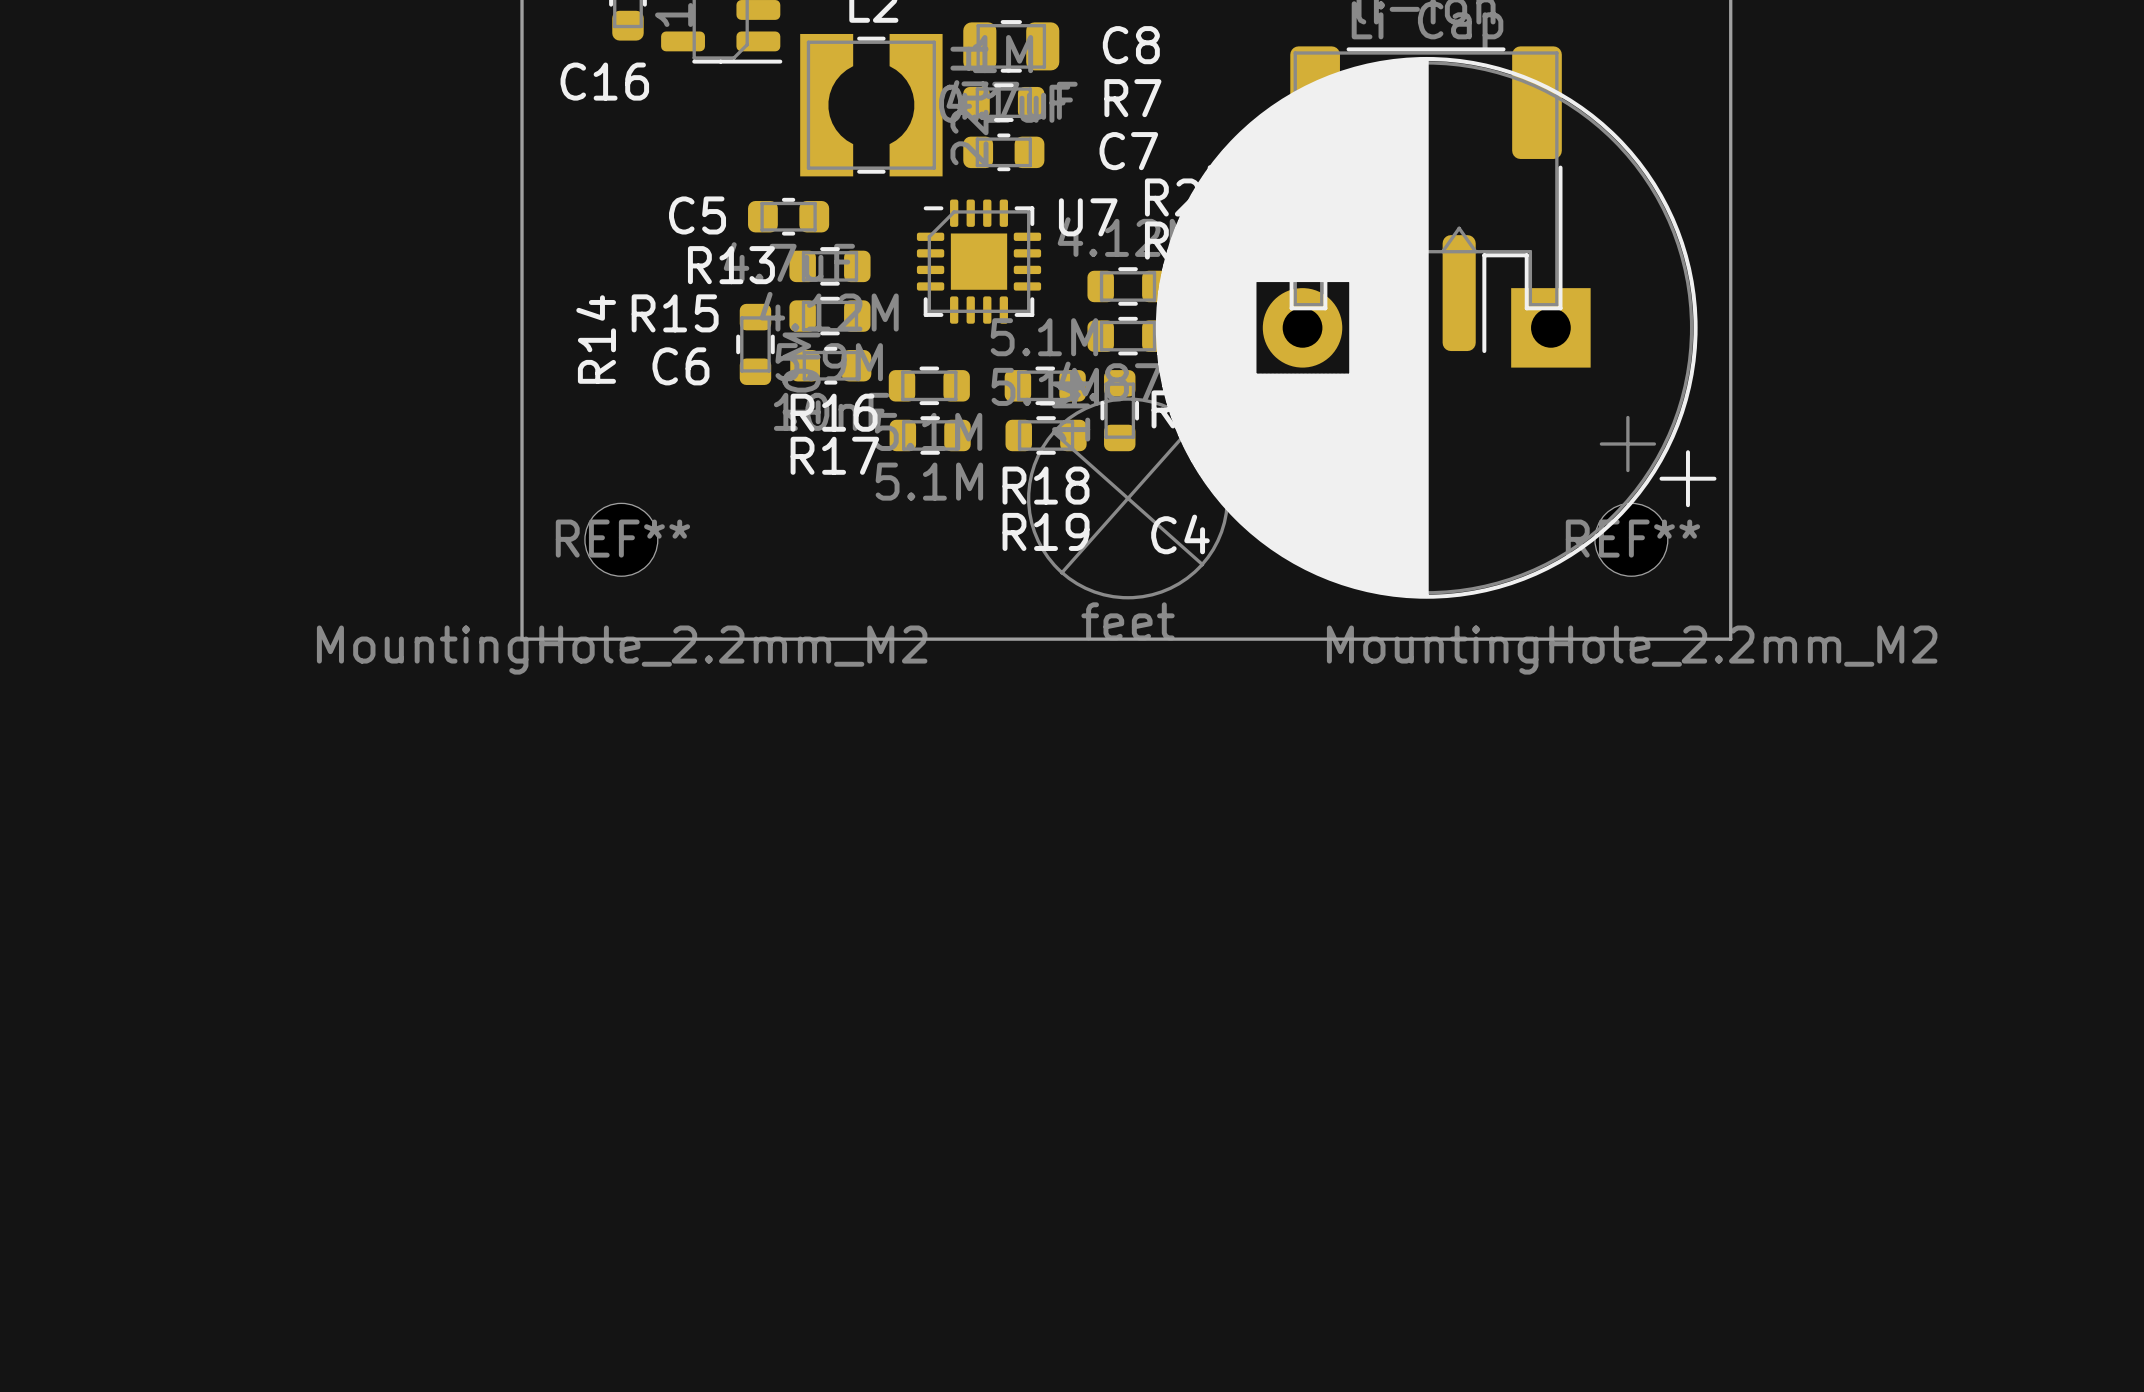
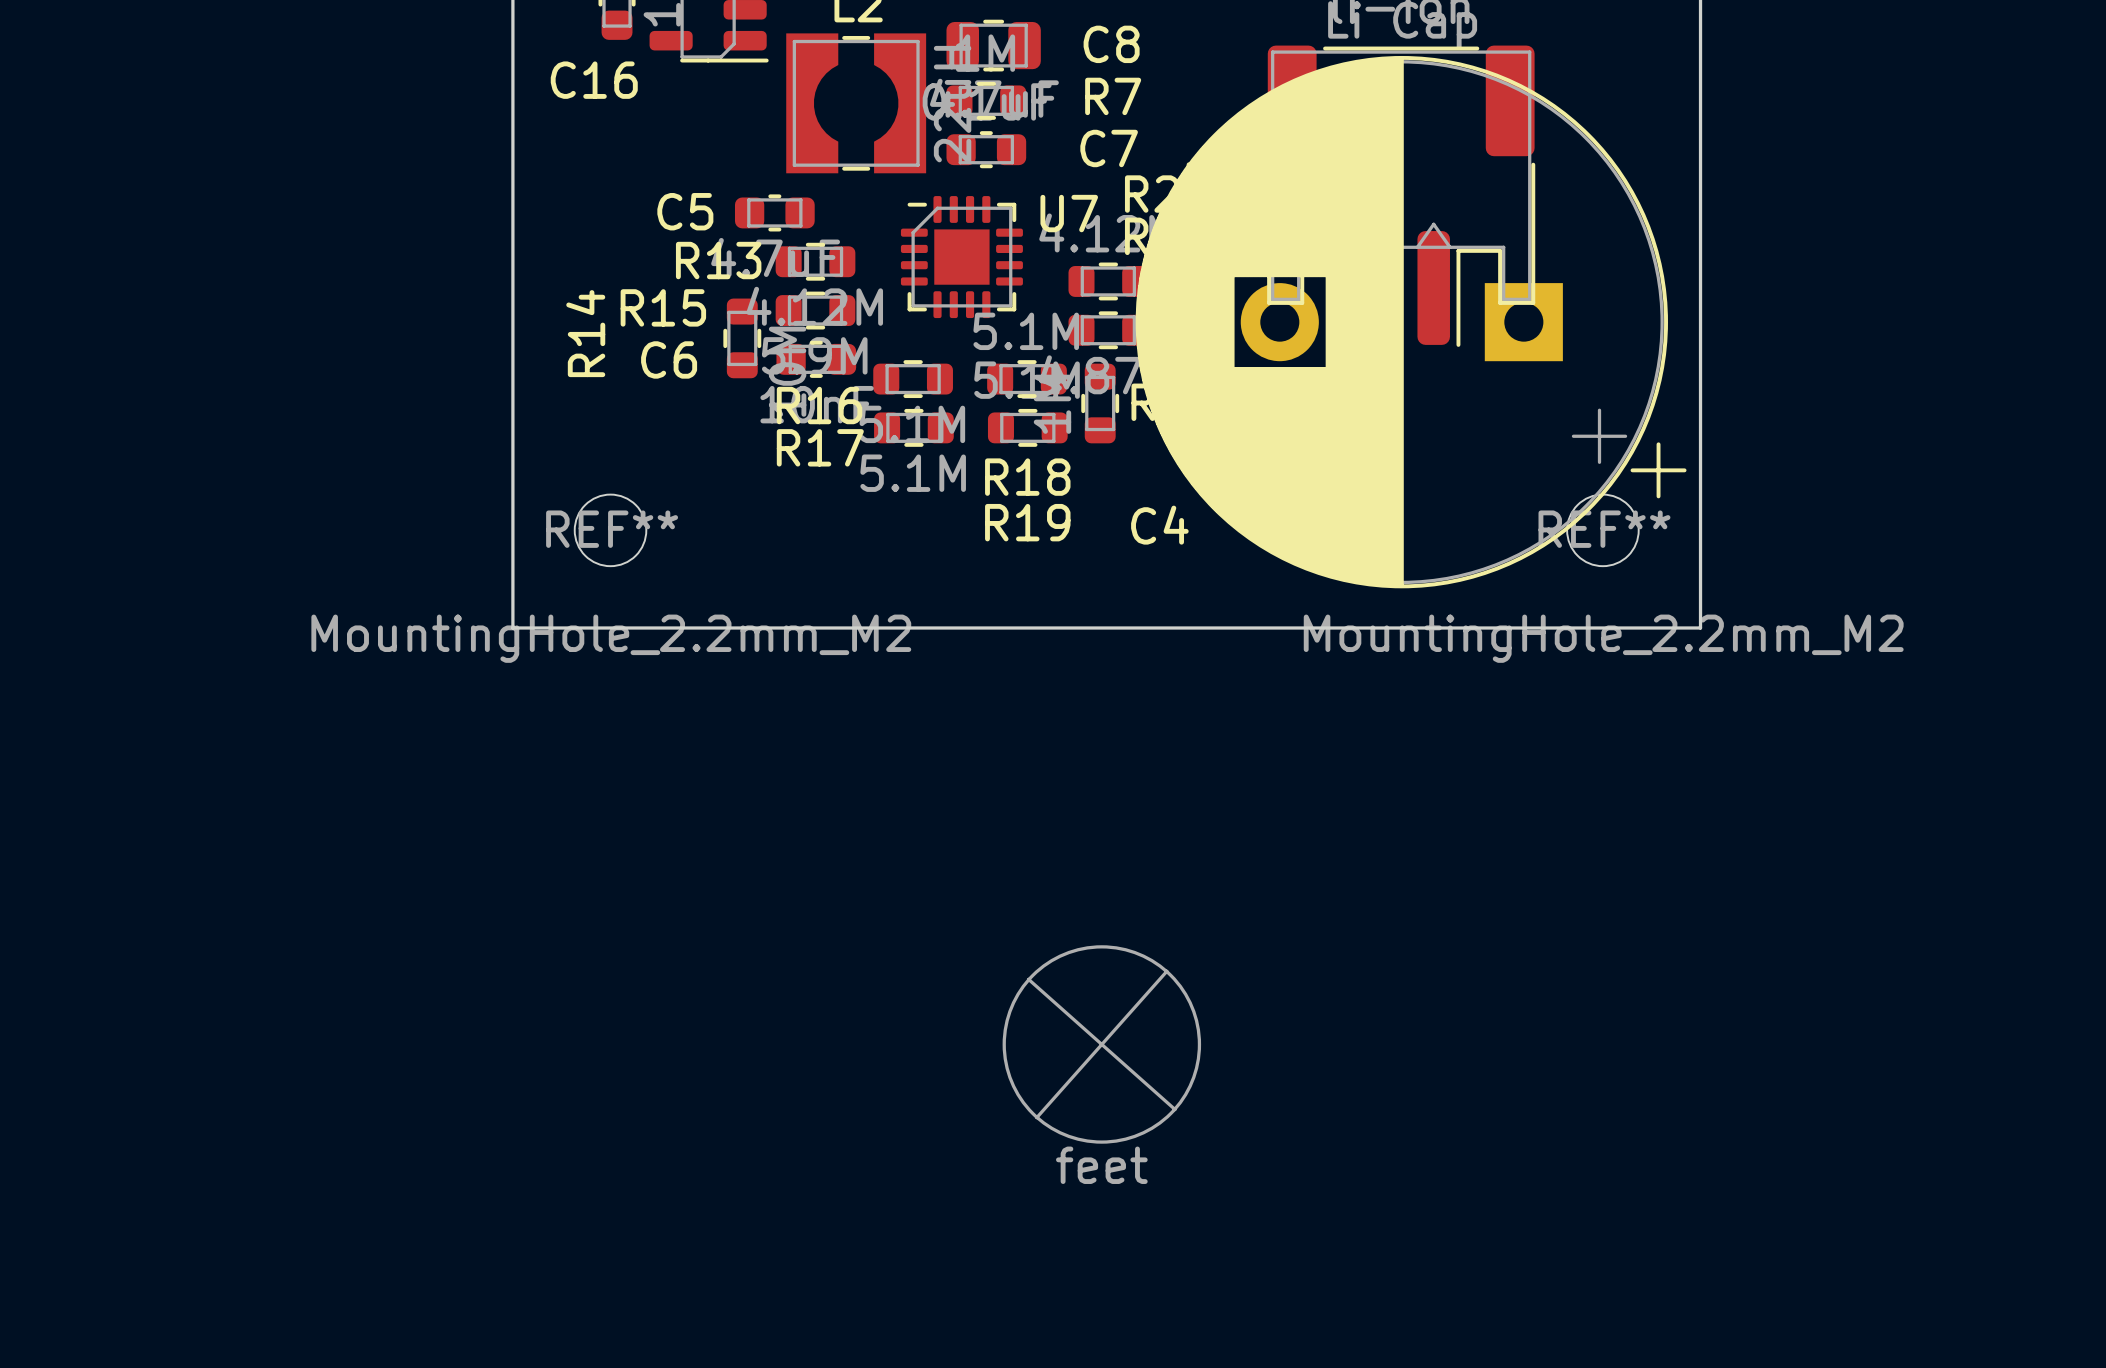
drawing position: (1128, 498) -> (1101, 1044)

